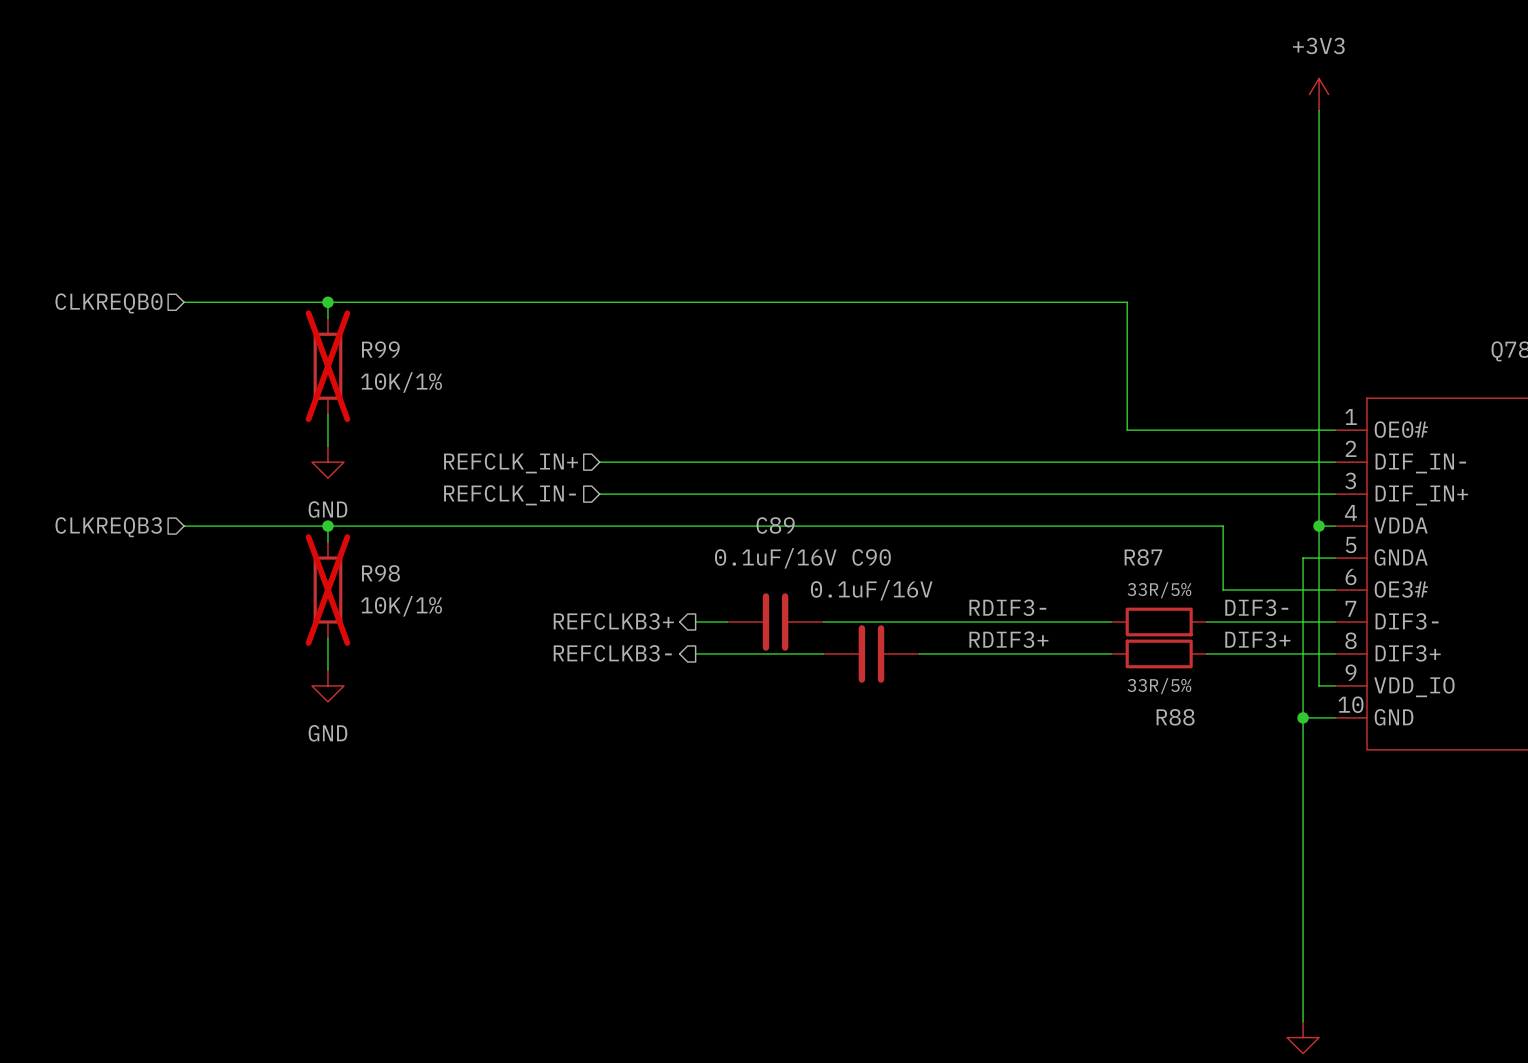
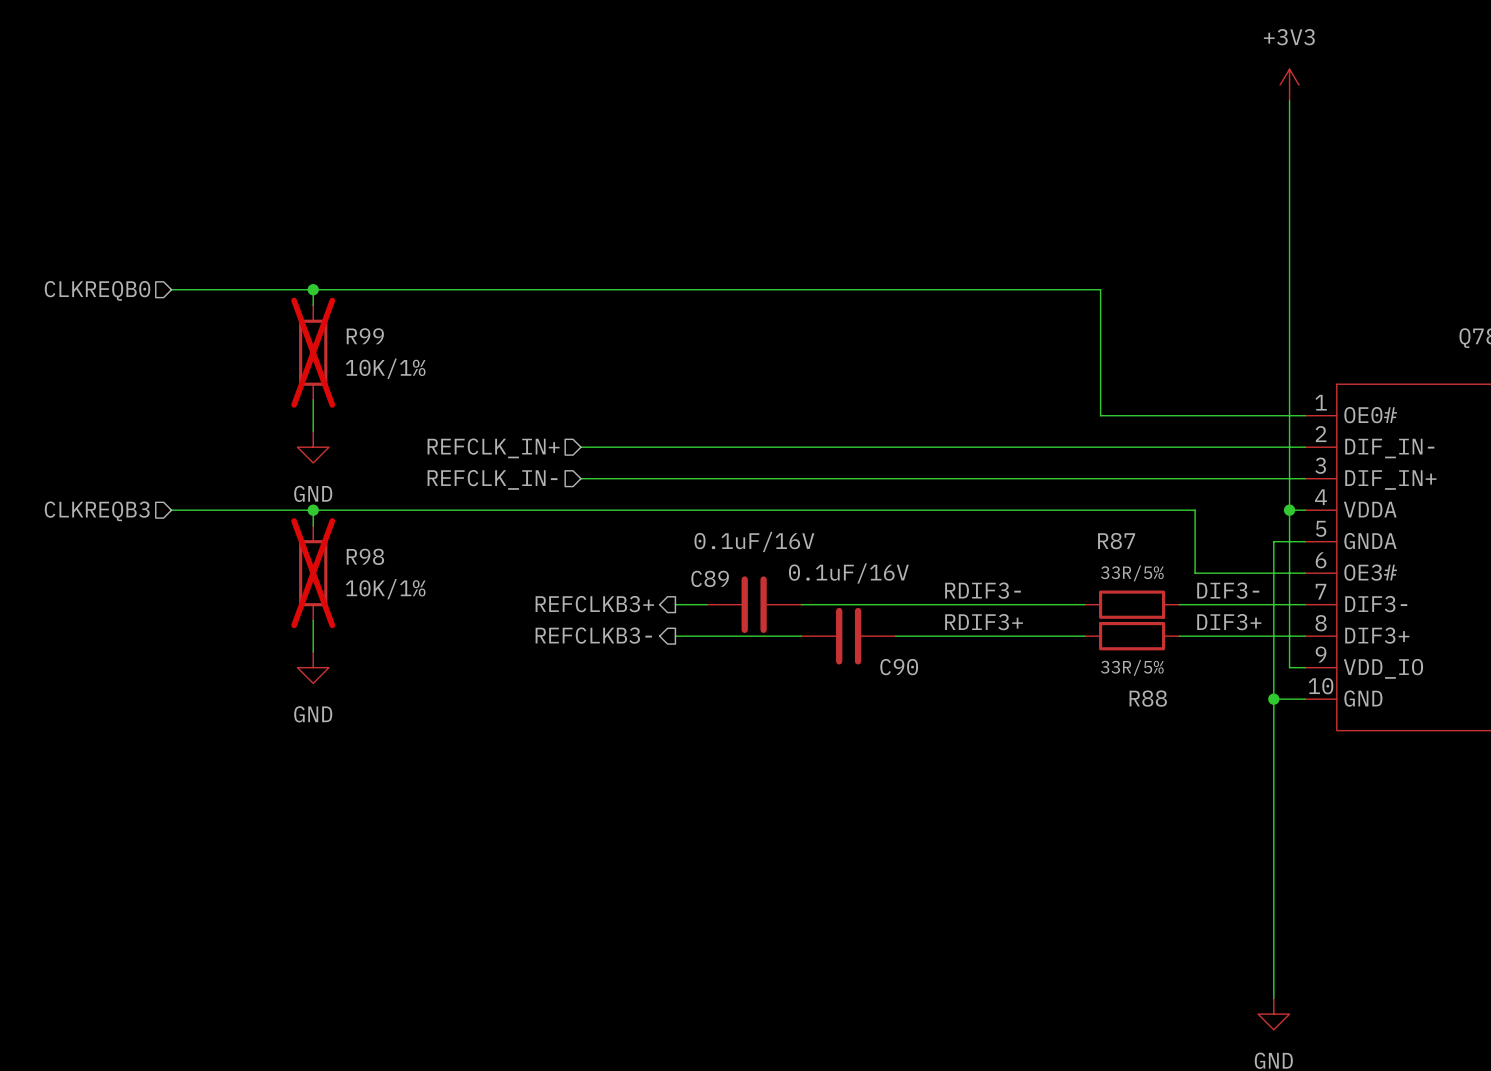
C89 name position: C89 (775, 525) -> C89 (710, 578)
C90 name position: C90 (871, 557) -> C90 (899, 667)

